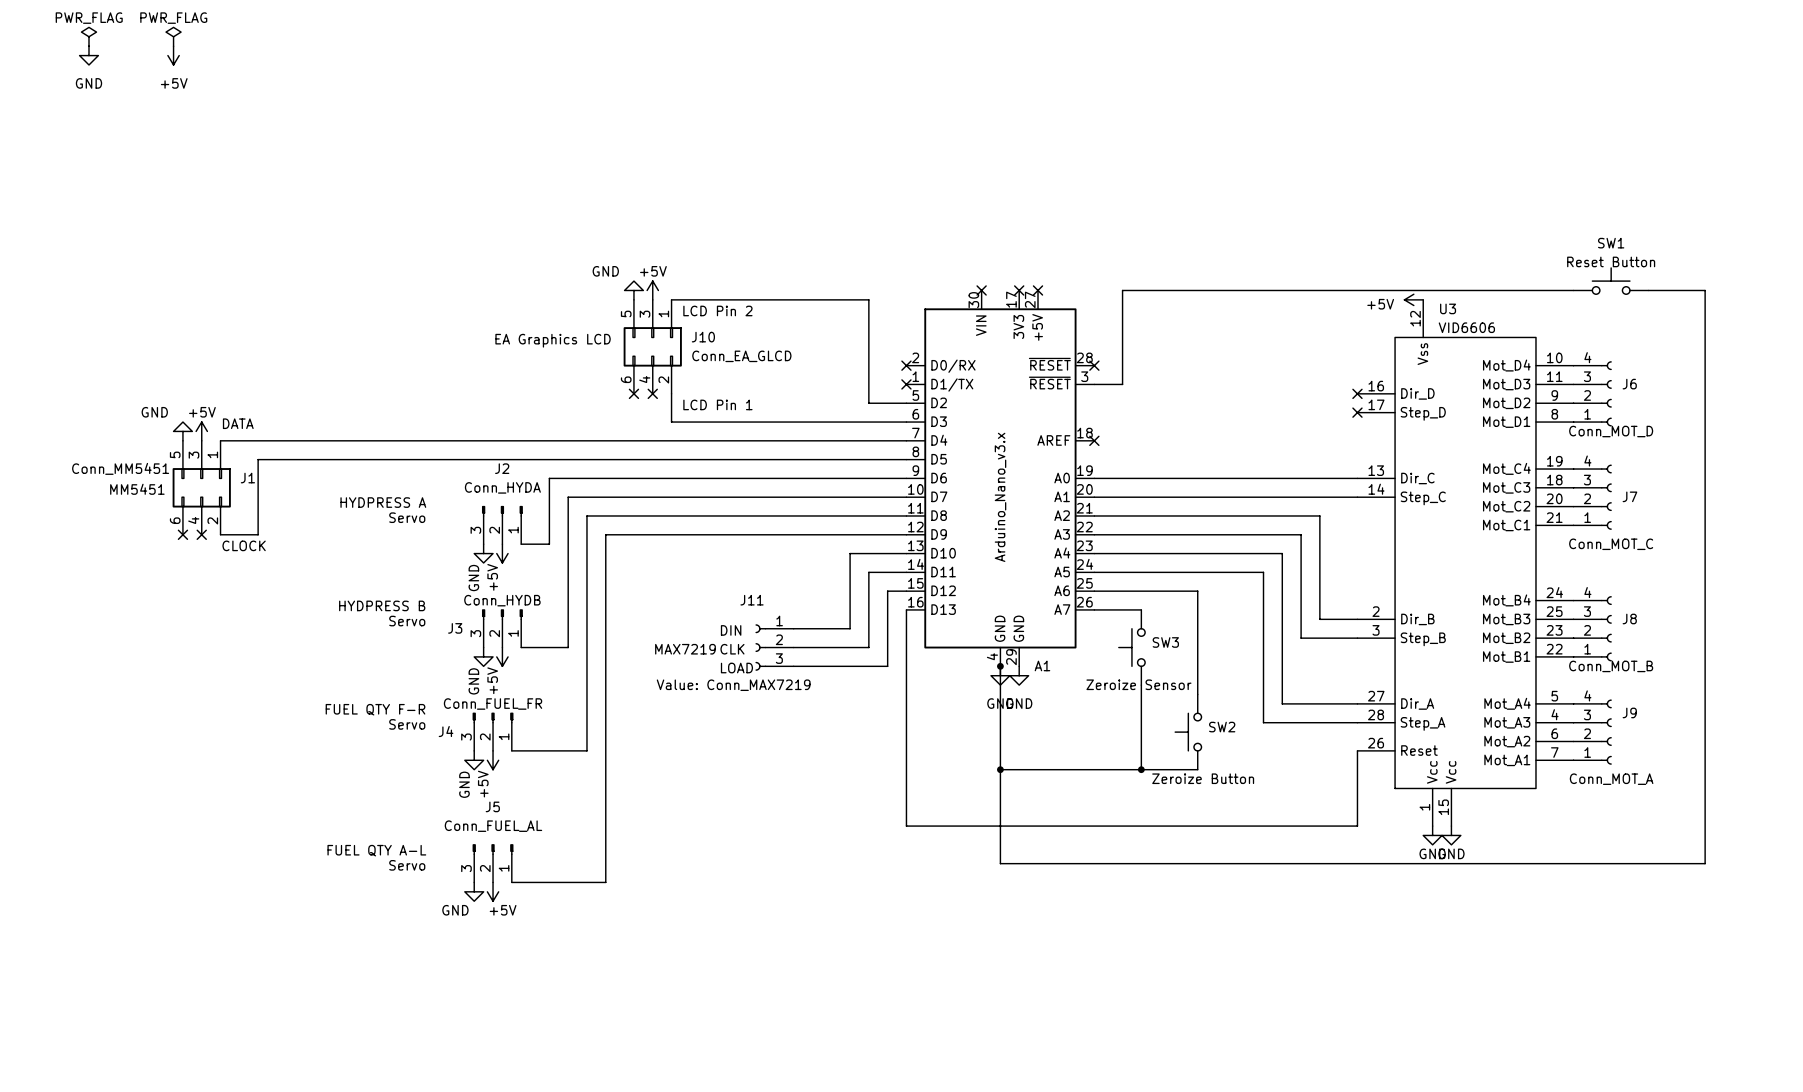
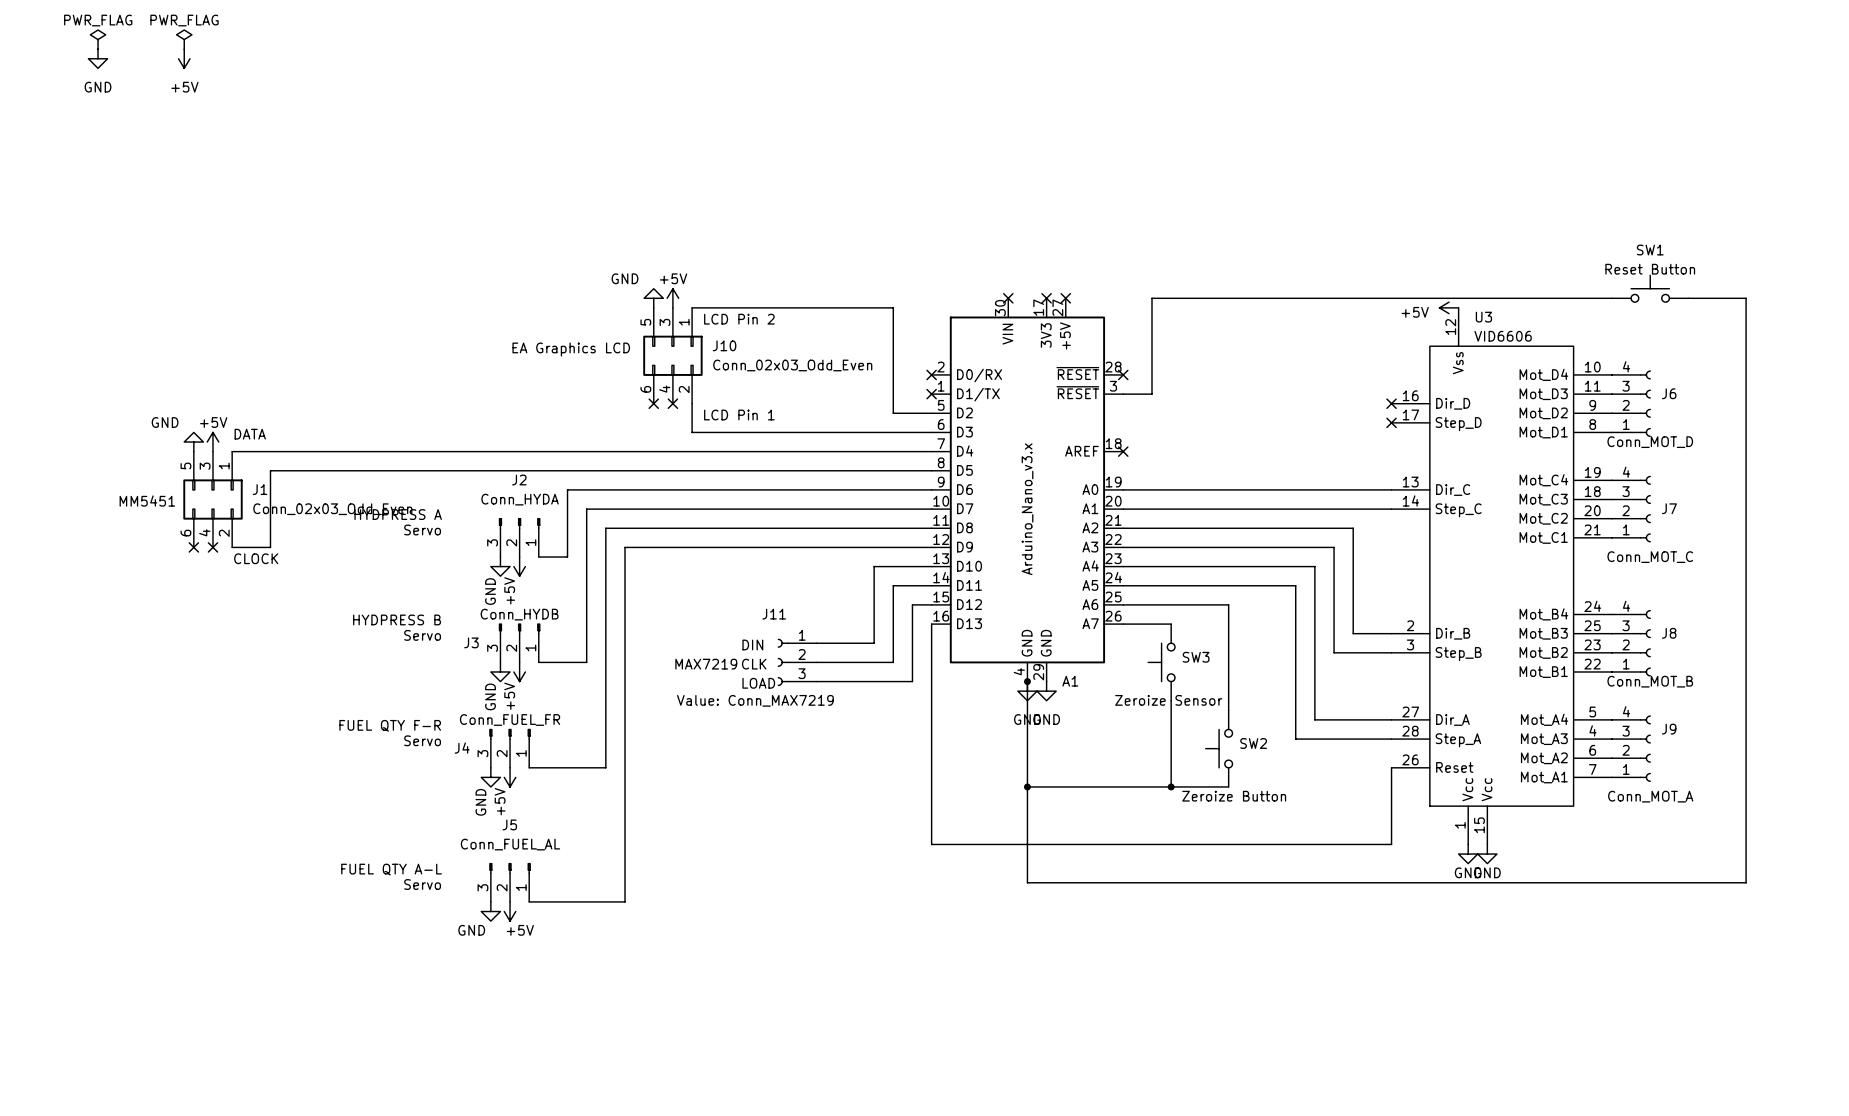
J10 value: Conn_EA_GLCD (741, 356) -> Conn_02x03_Odd_Even (792, 365)
J1 value: Conn_MM5451 (120, 468) -> Conn_02x03_Odd_Even (332, 509)

